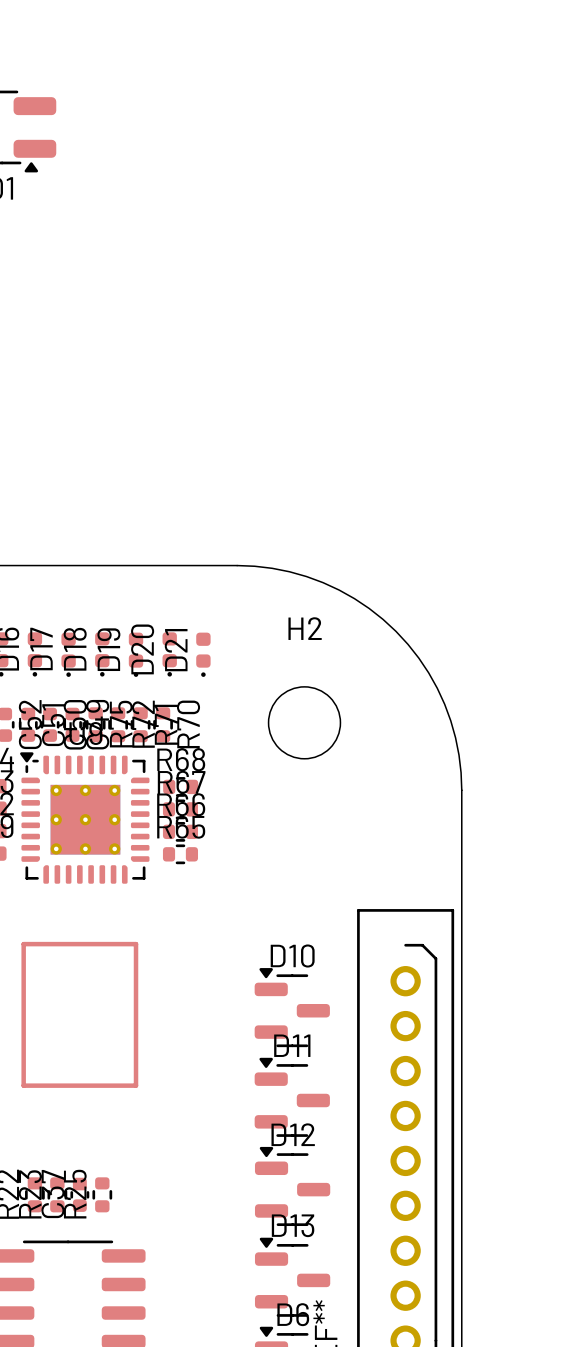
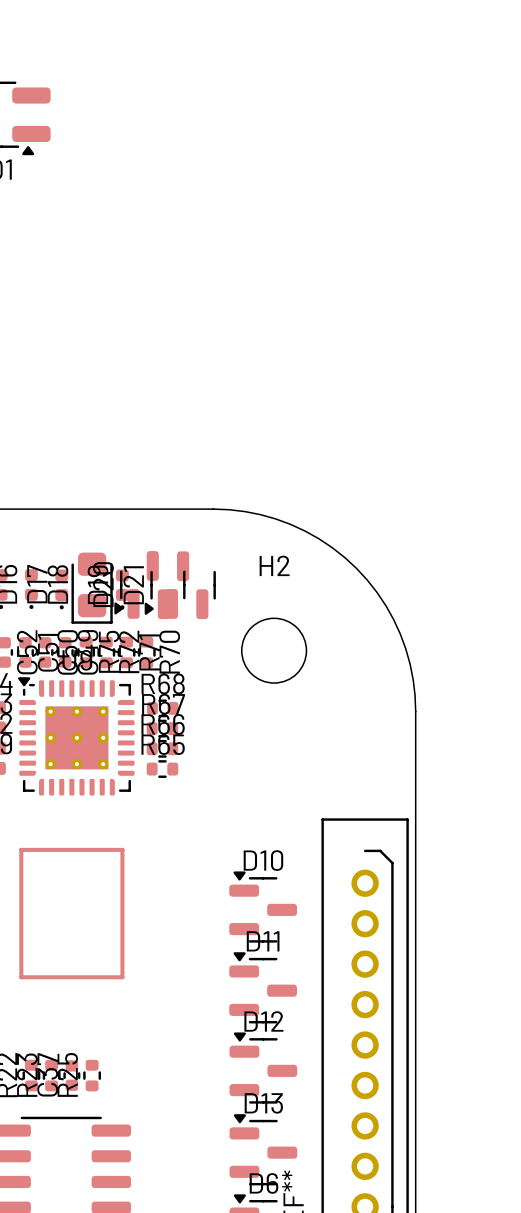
D18 footprint: [95, 632, 110, 677] -> [71, 552, 113, 624]
D20 footprint: [162, 632, 177, 677] -> [114, 551, 186, 619]
D21 footprint: [196, 632, 211, 677] -> [144, 551, 216, 620]

